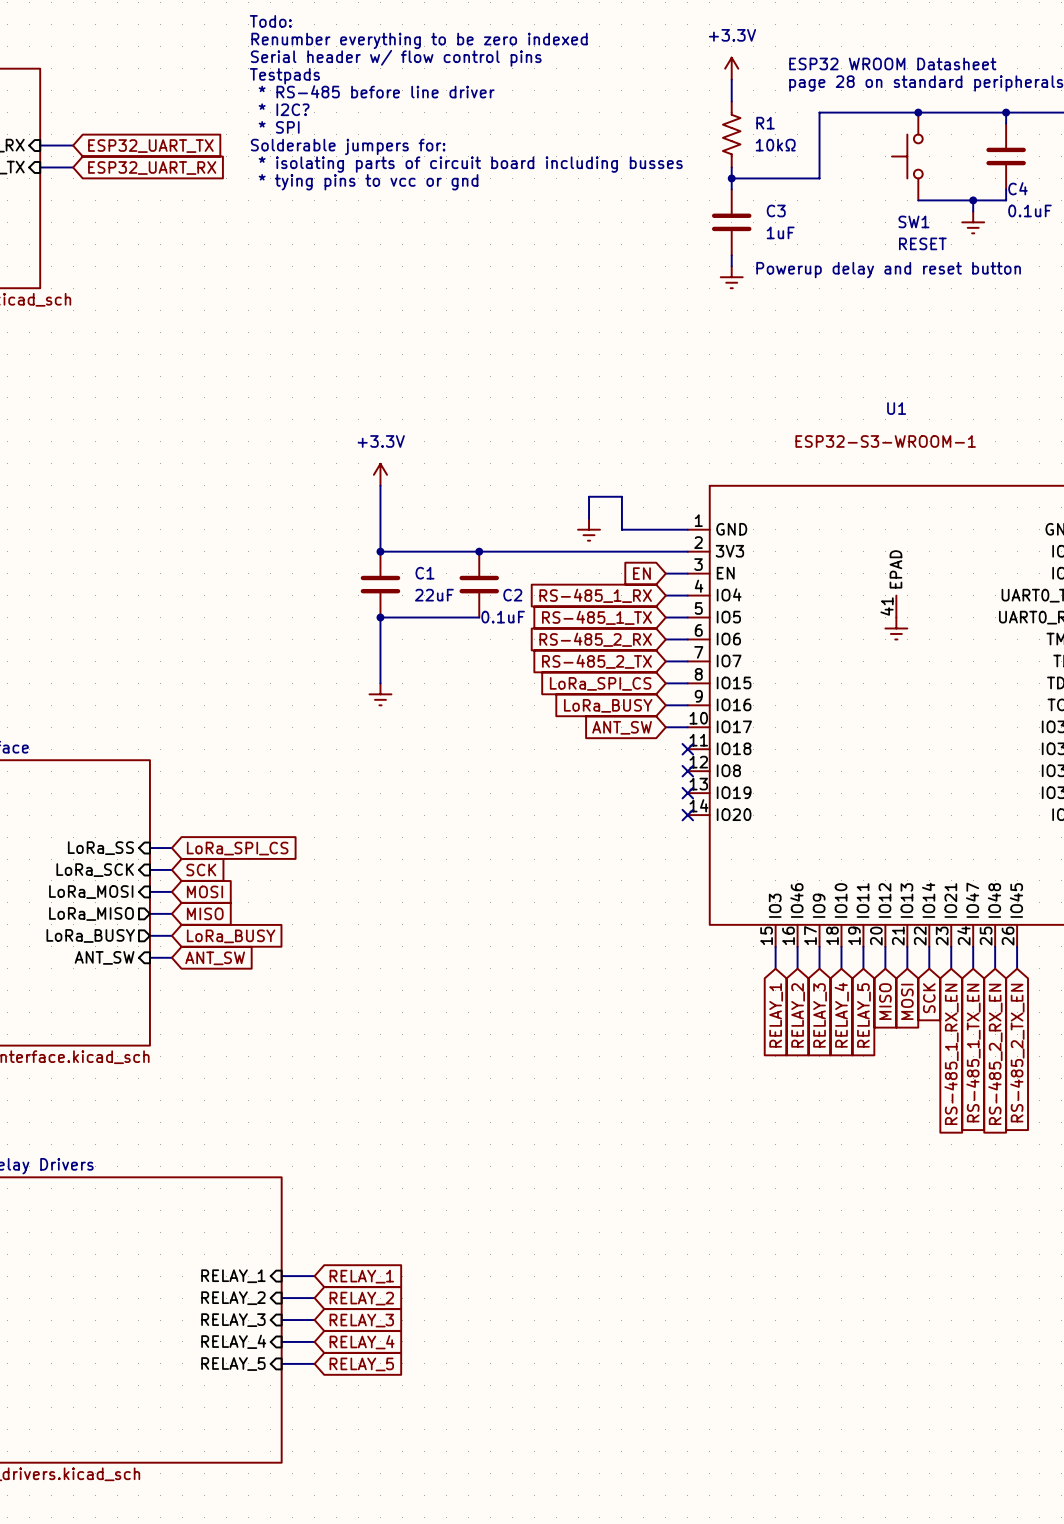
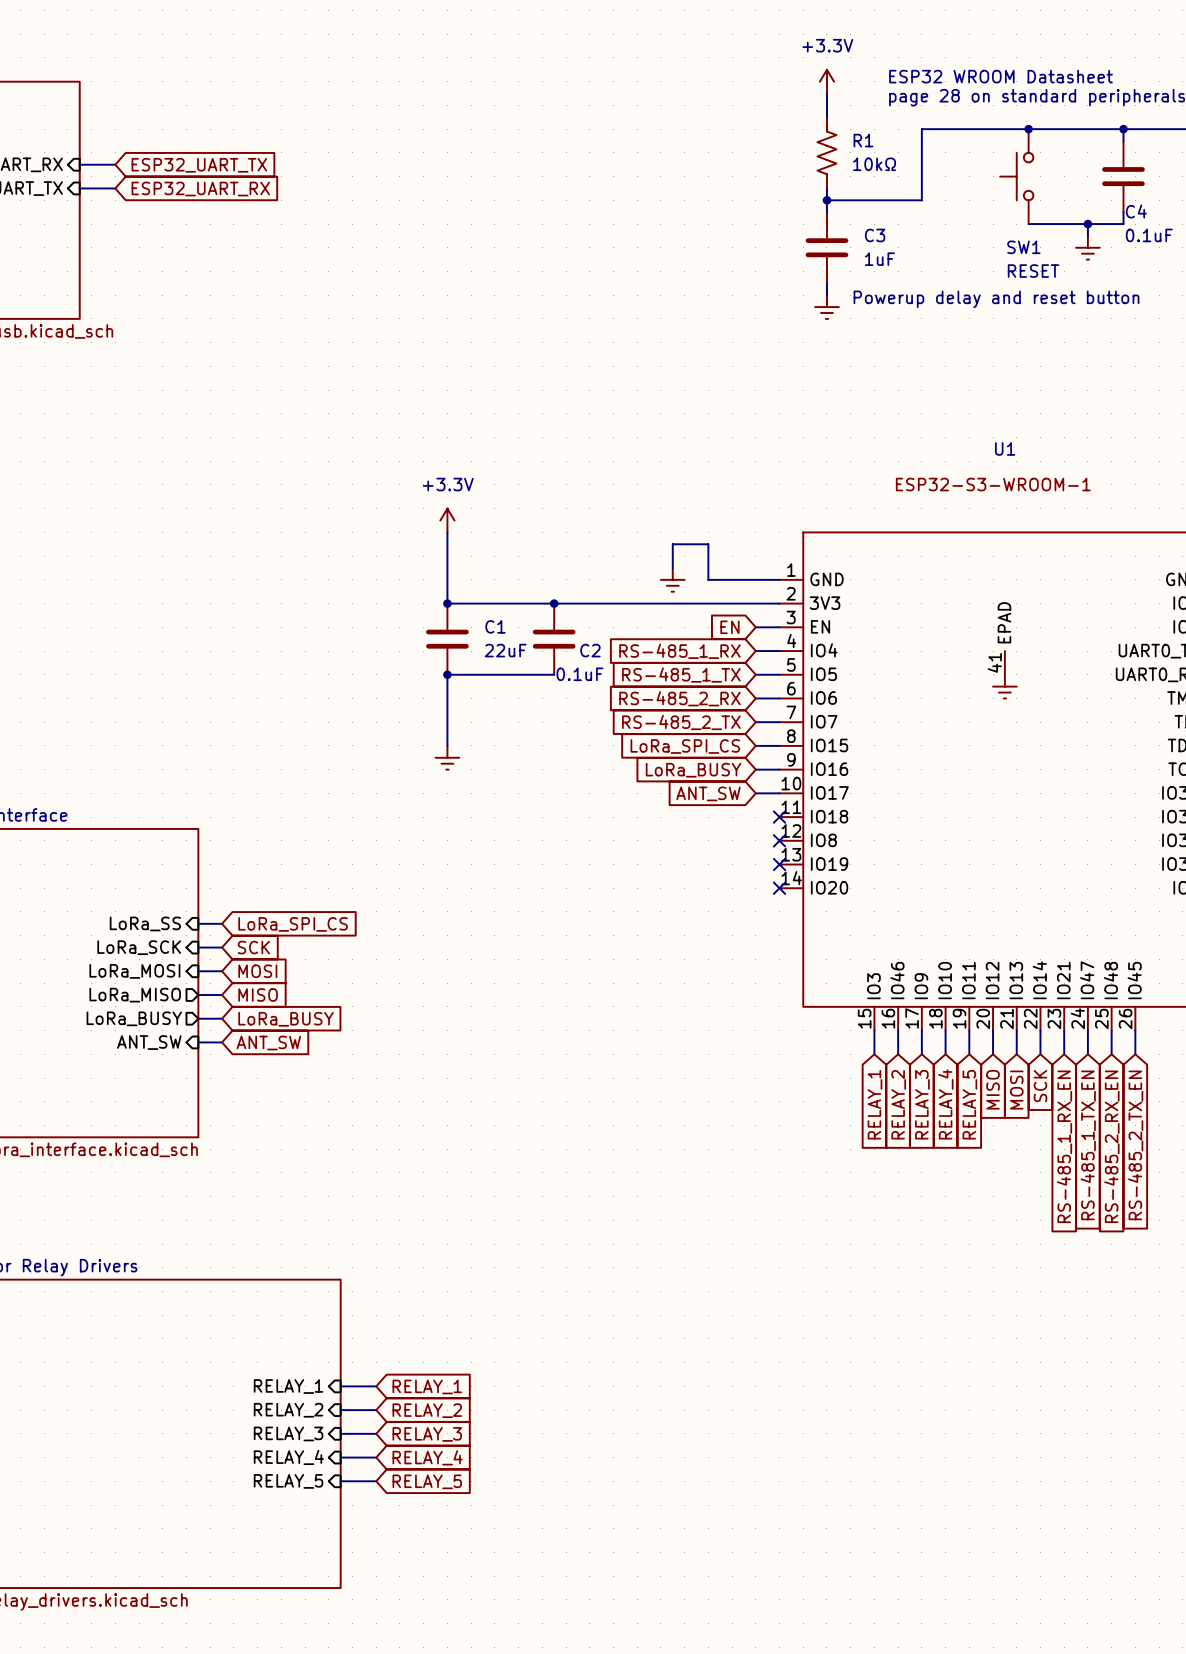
text: Todo: (270, 21) -> none
text: Renumber everything to be zero indexed (419, 40) -> none
text: Serial header w/ flow control pins (396, 58) -> none
text: Testpads (284, 76) -> none
text: * RS-485 before line driver (376, 91) -> none
text: * I2C? (284, 109) -> none
text: * SPI (279, 127) -> none
text: Solderable jumpers for: (348, 146) -> none
text: * isolating parts of circuit board including busses (470, 164) -> none
text: * tying pins to vcc or gnd (368, 182) -> none

